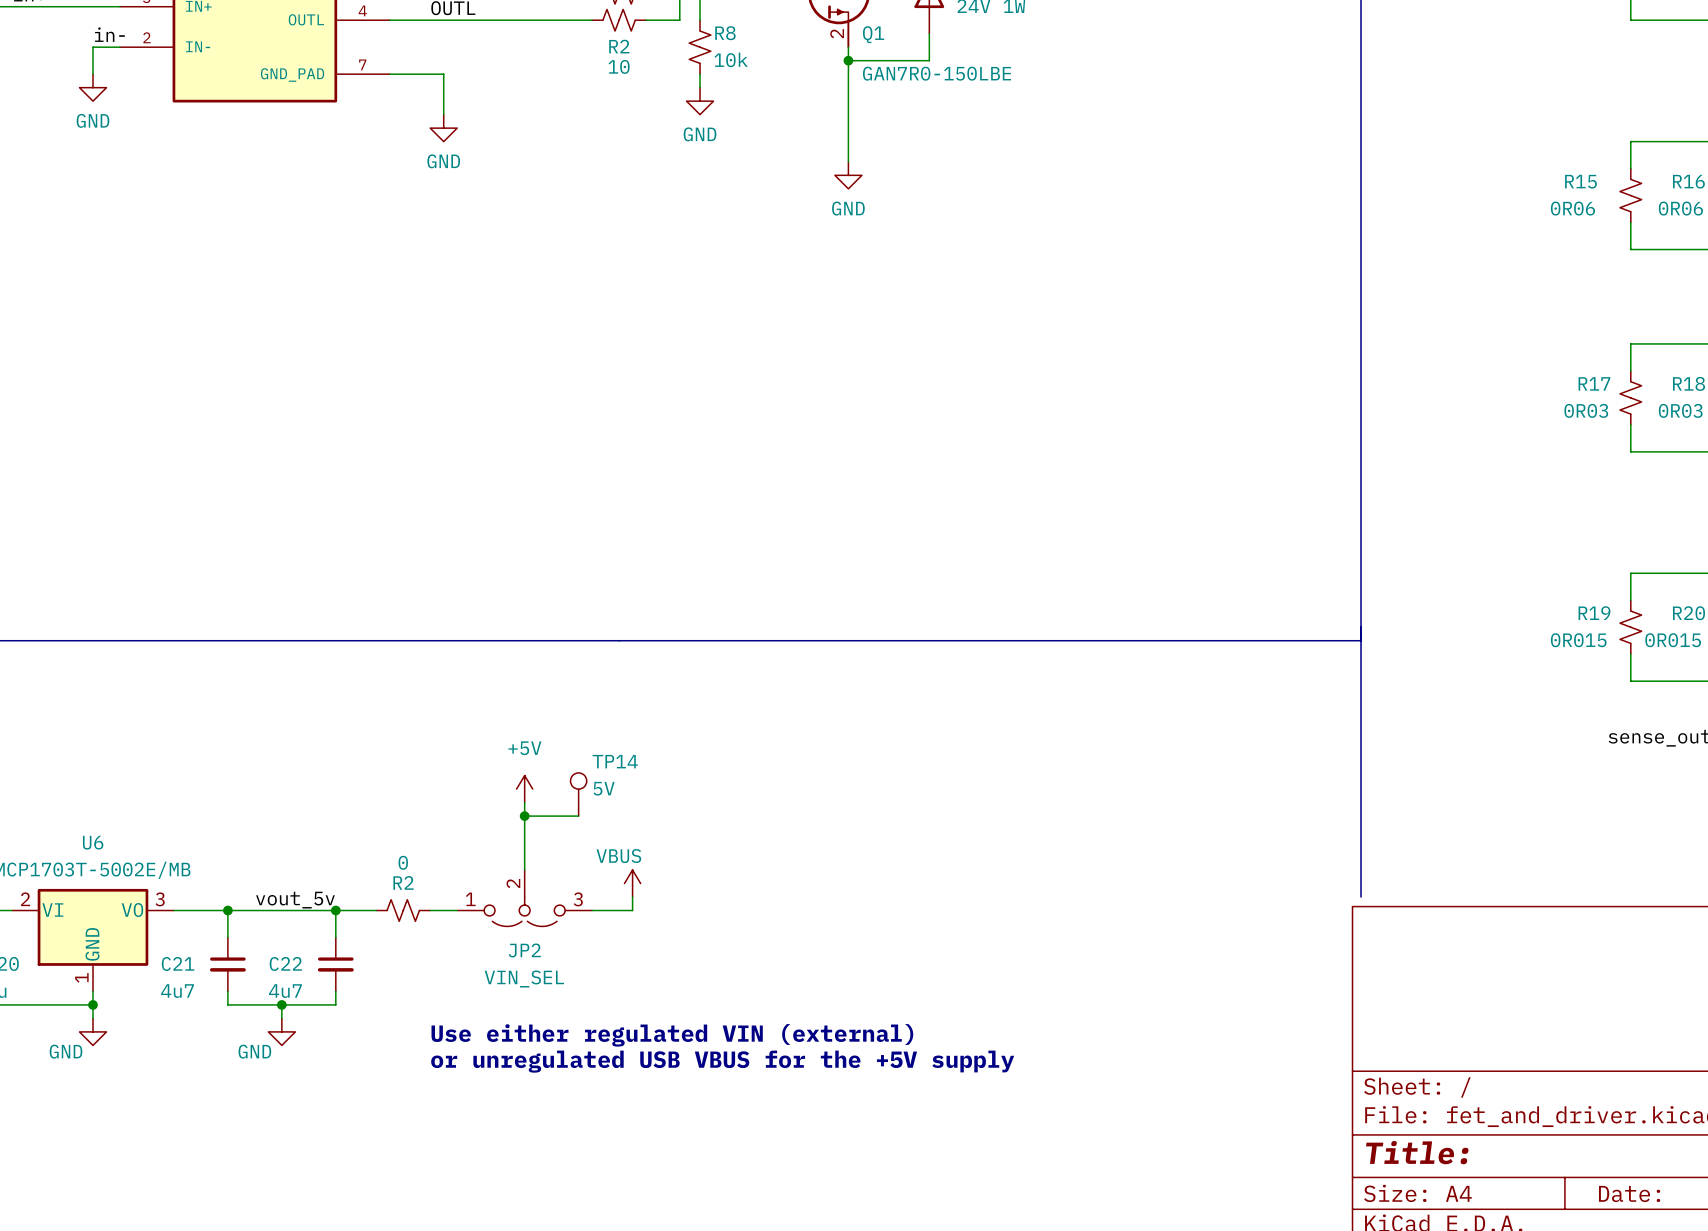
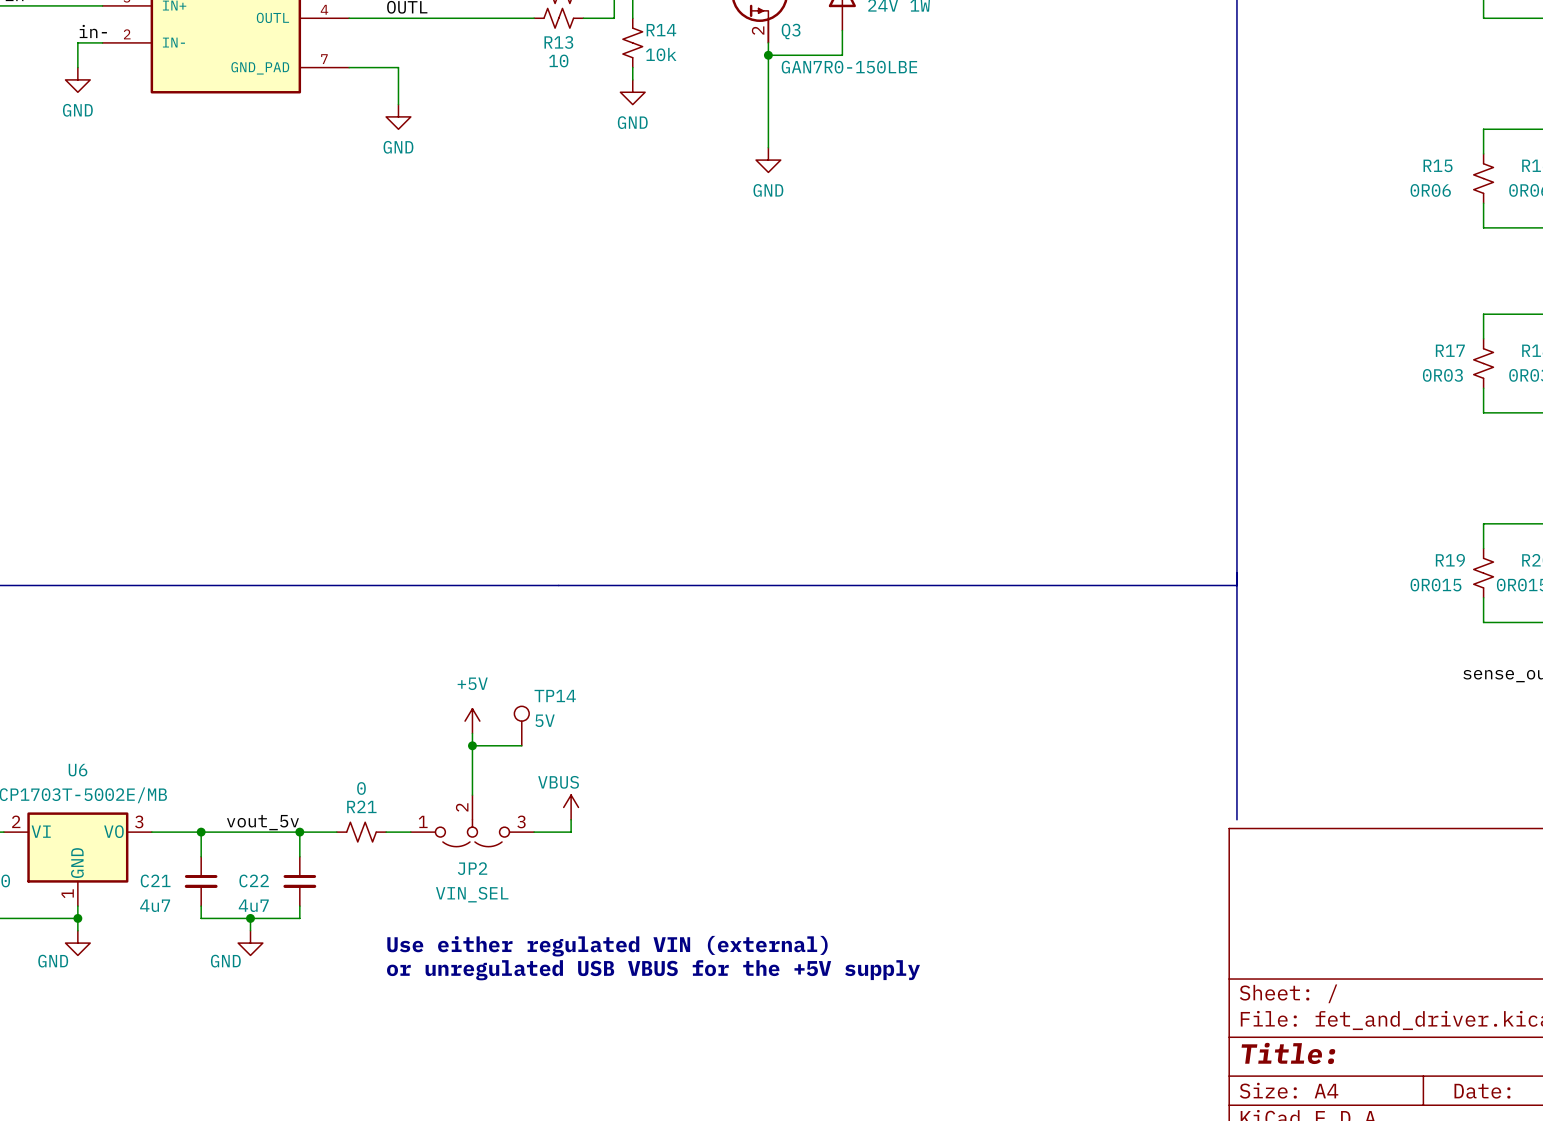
R8 name: R8 (725, 33) -> R14 (661, 30)
Q1 name: Q1 (873, 34) -> Q3 (791, 31)
R2 name: R2 (619, 46) -> R13 (558, 42)
R2 name: R2 (403, 882) -> R21 (361, 806)

